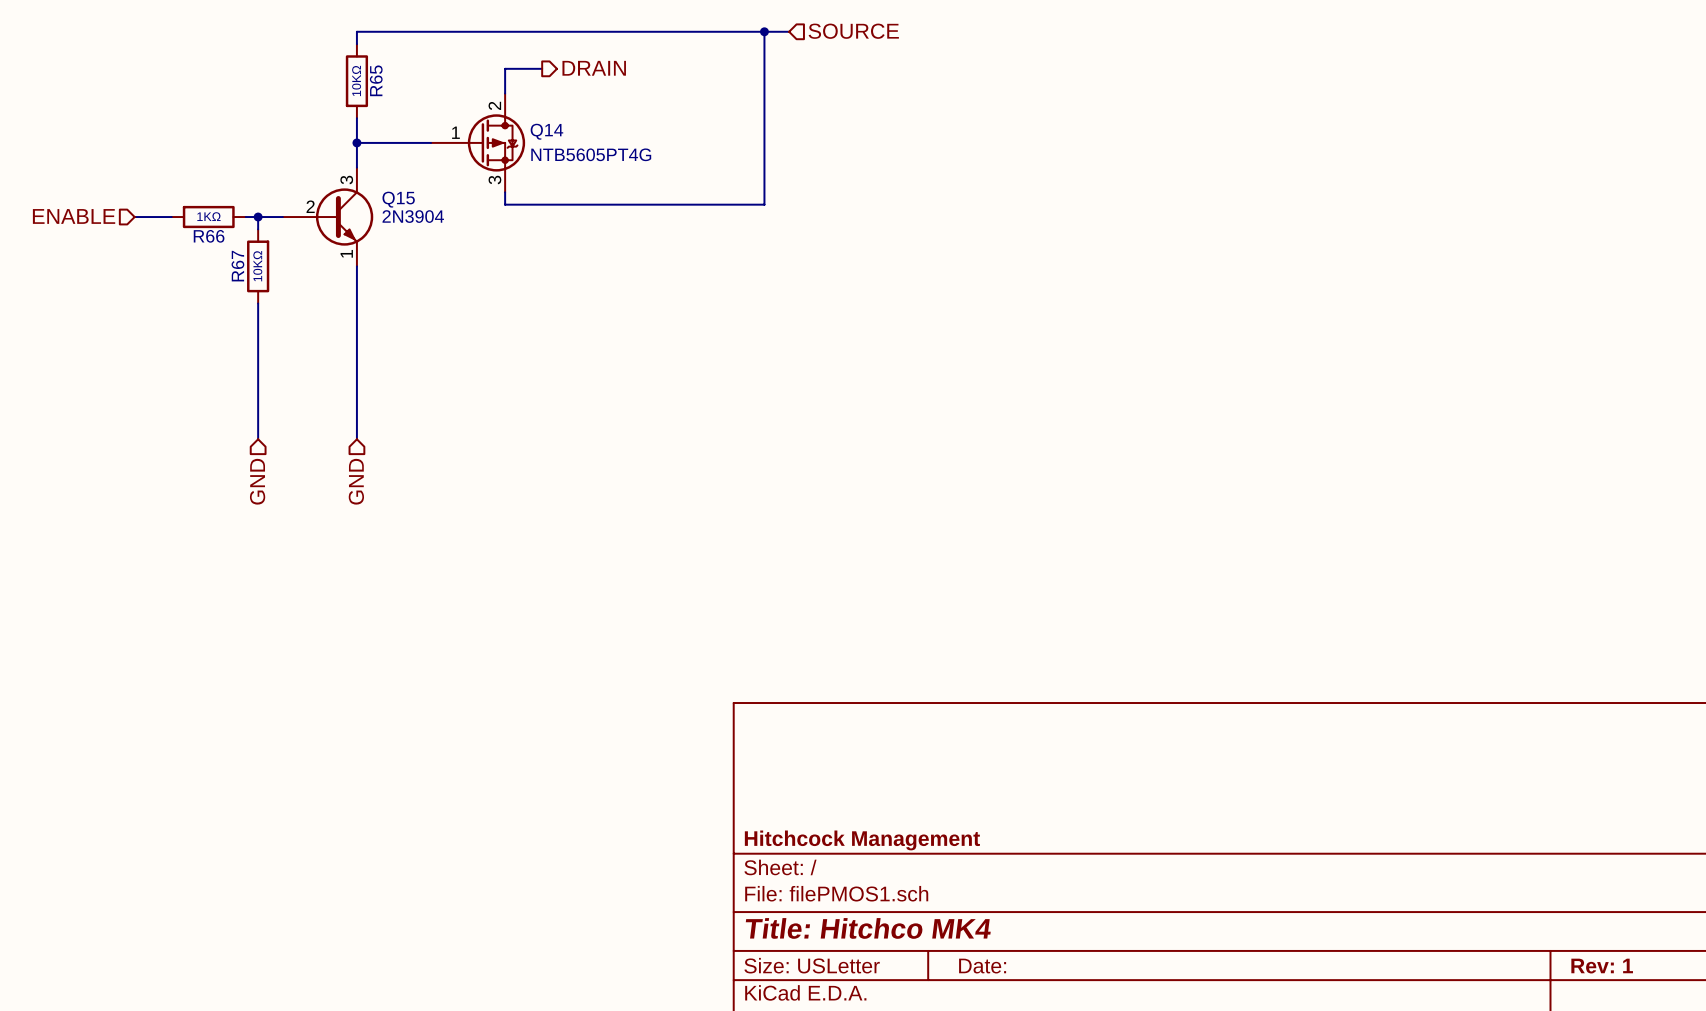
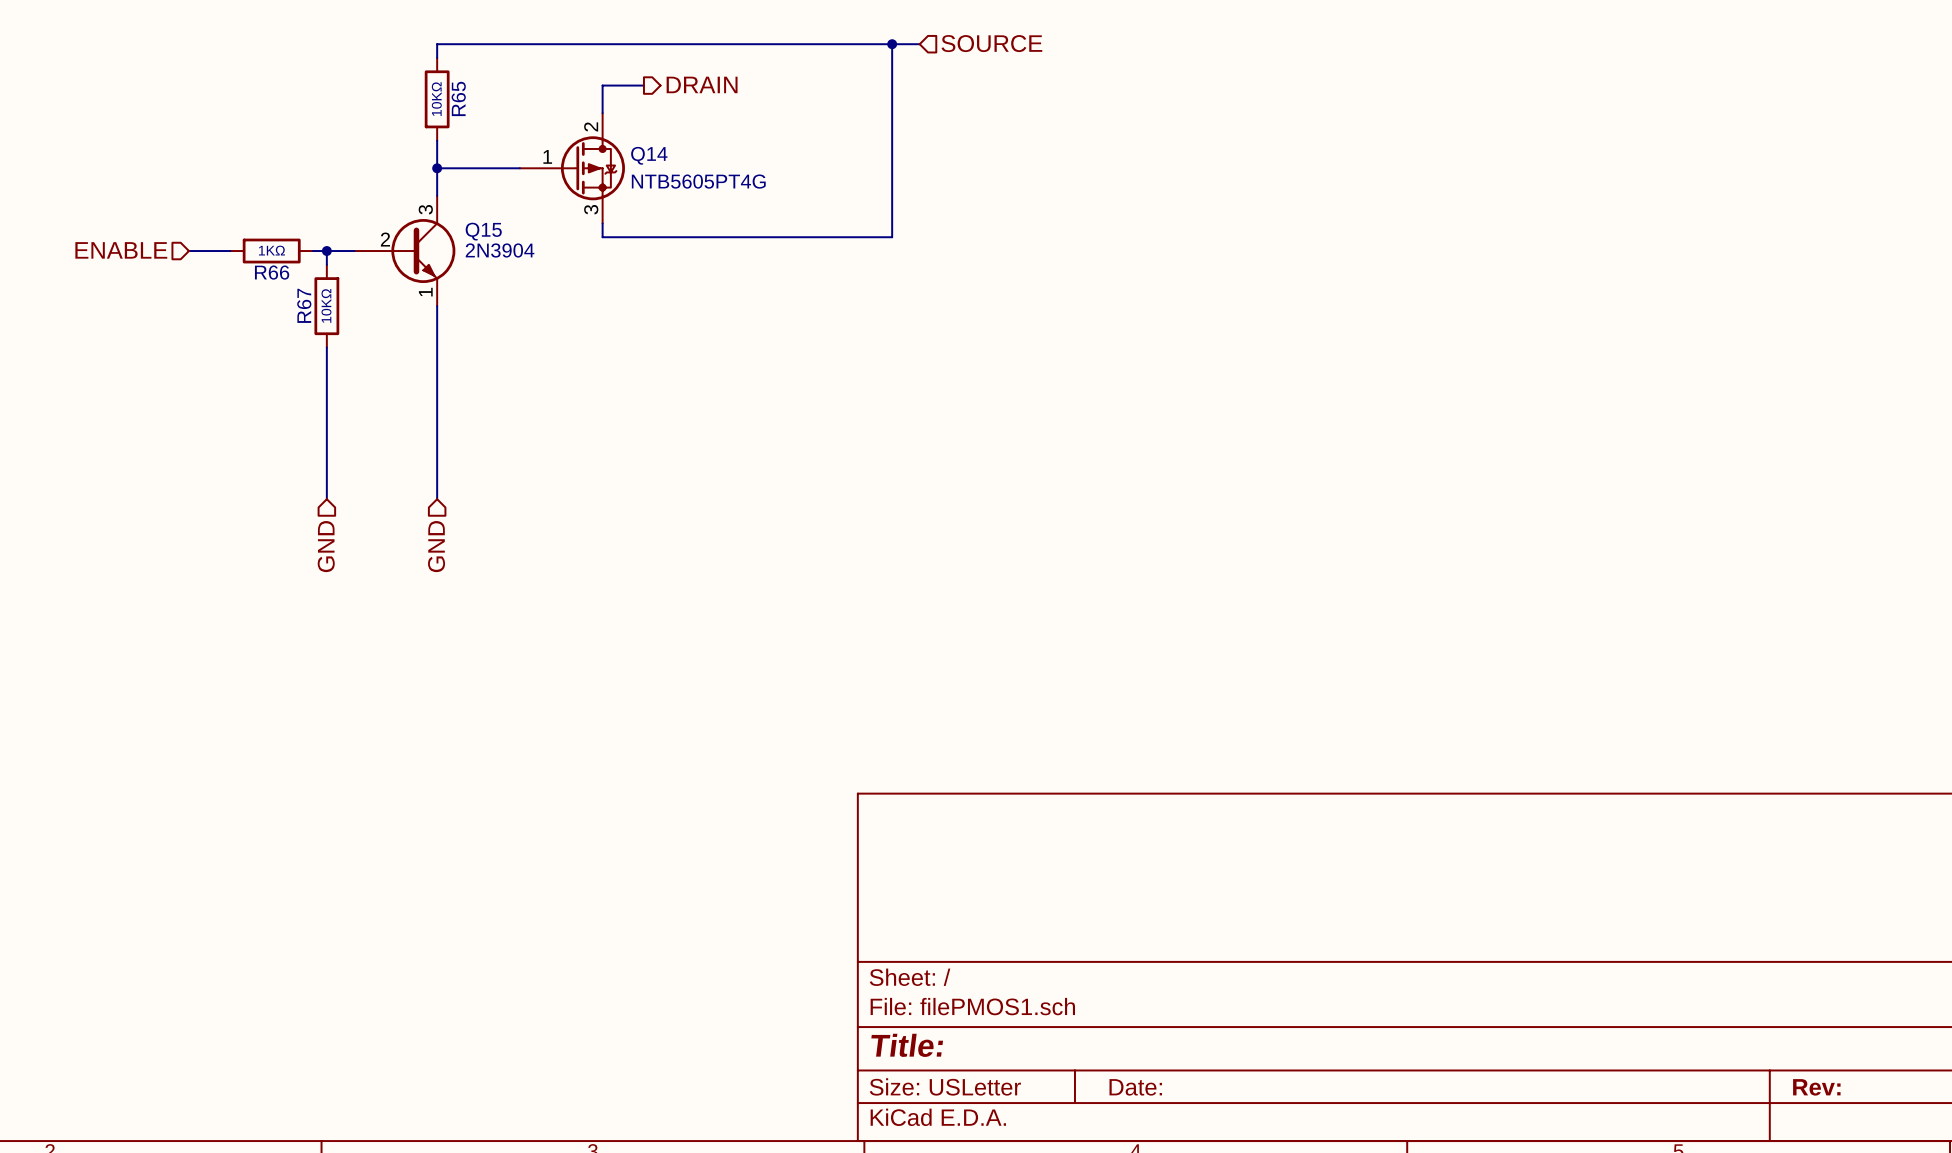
title block: Hitchcock Management (862, 840) -> none
title block: Title: Hitchco MK4 (868, 928) -> Title: (907, 1045)
title block: Rev: 1 (1602, 966) -> Rev: (1816, 1087)

